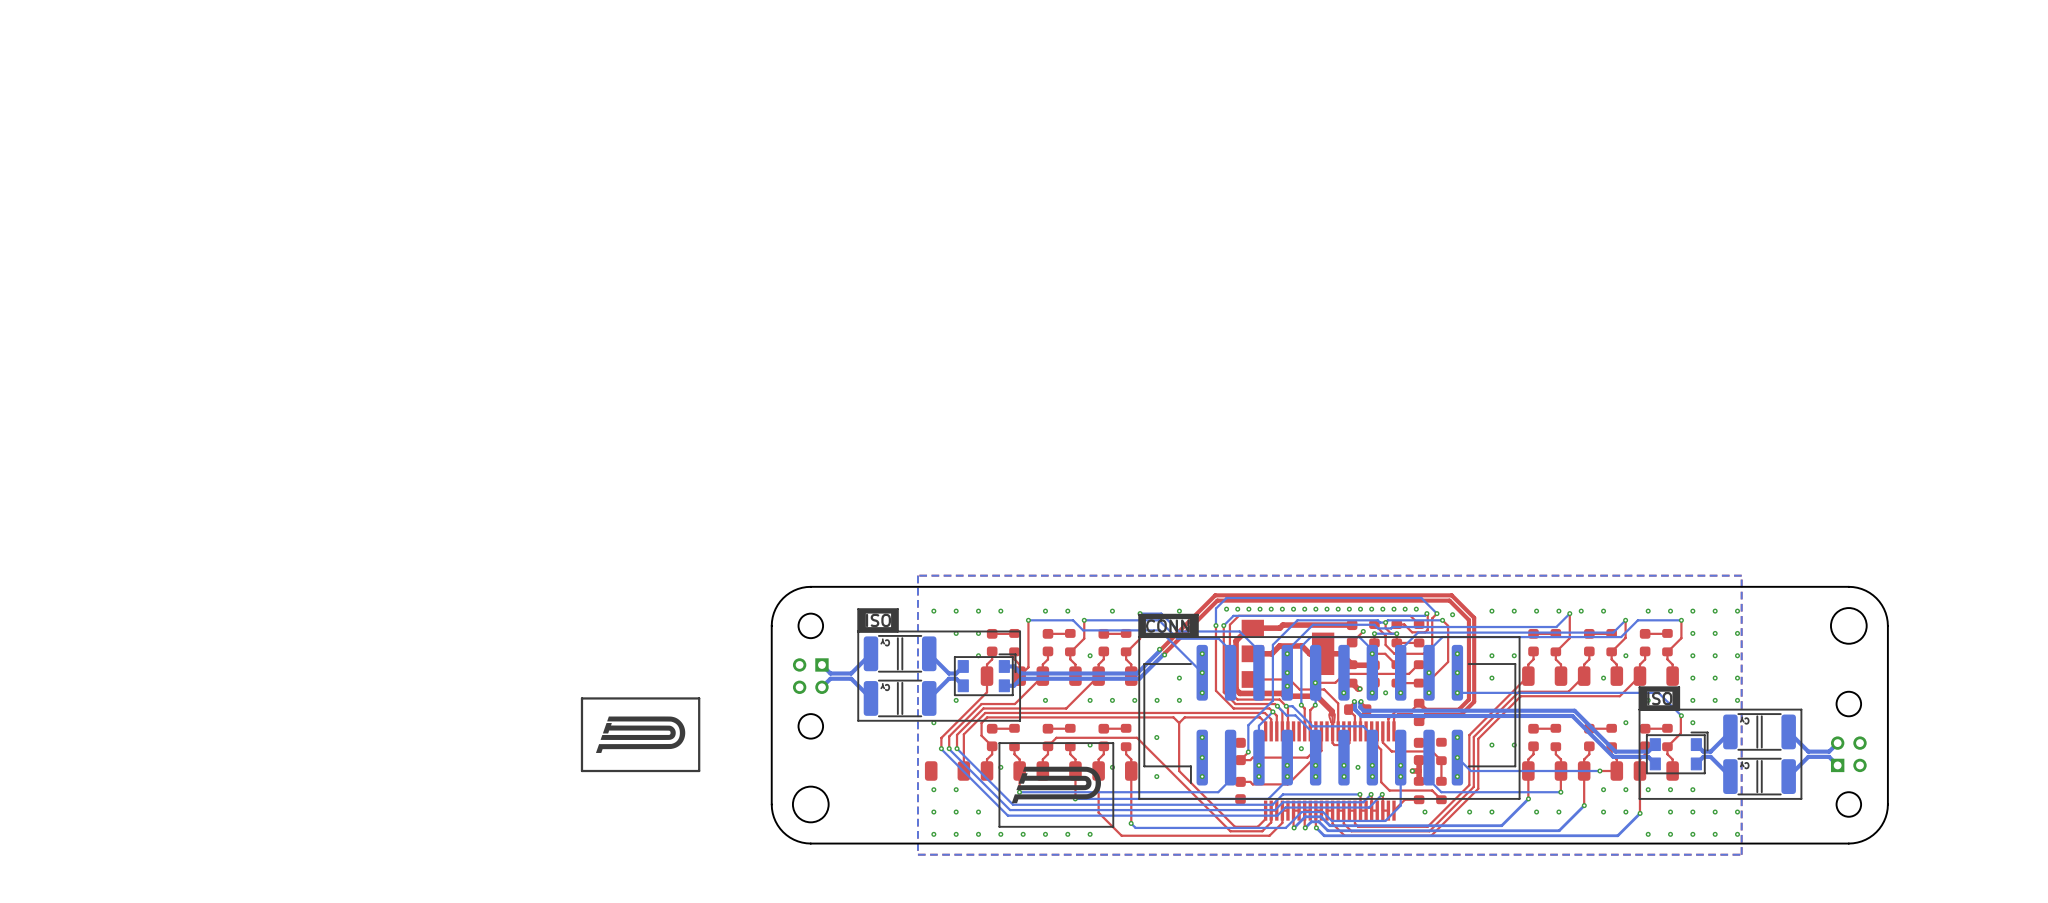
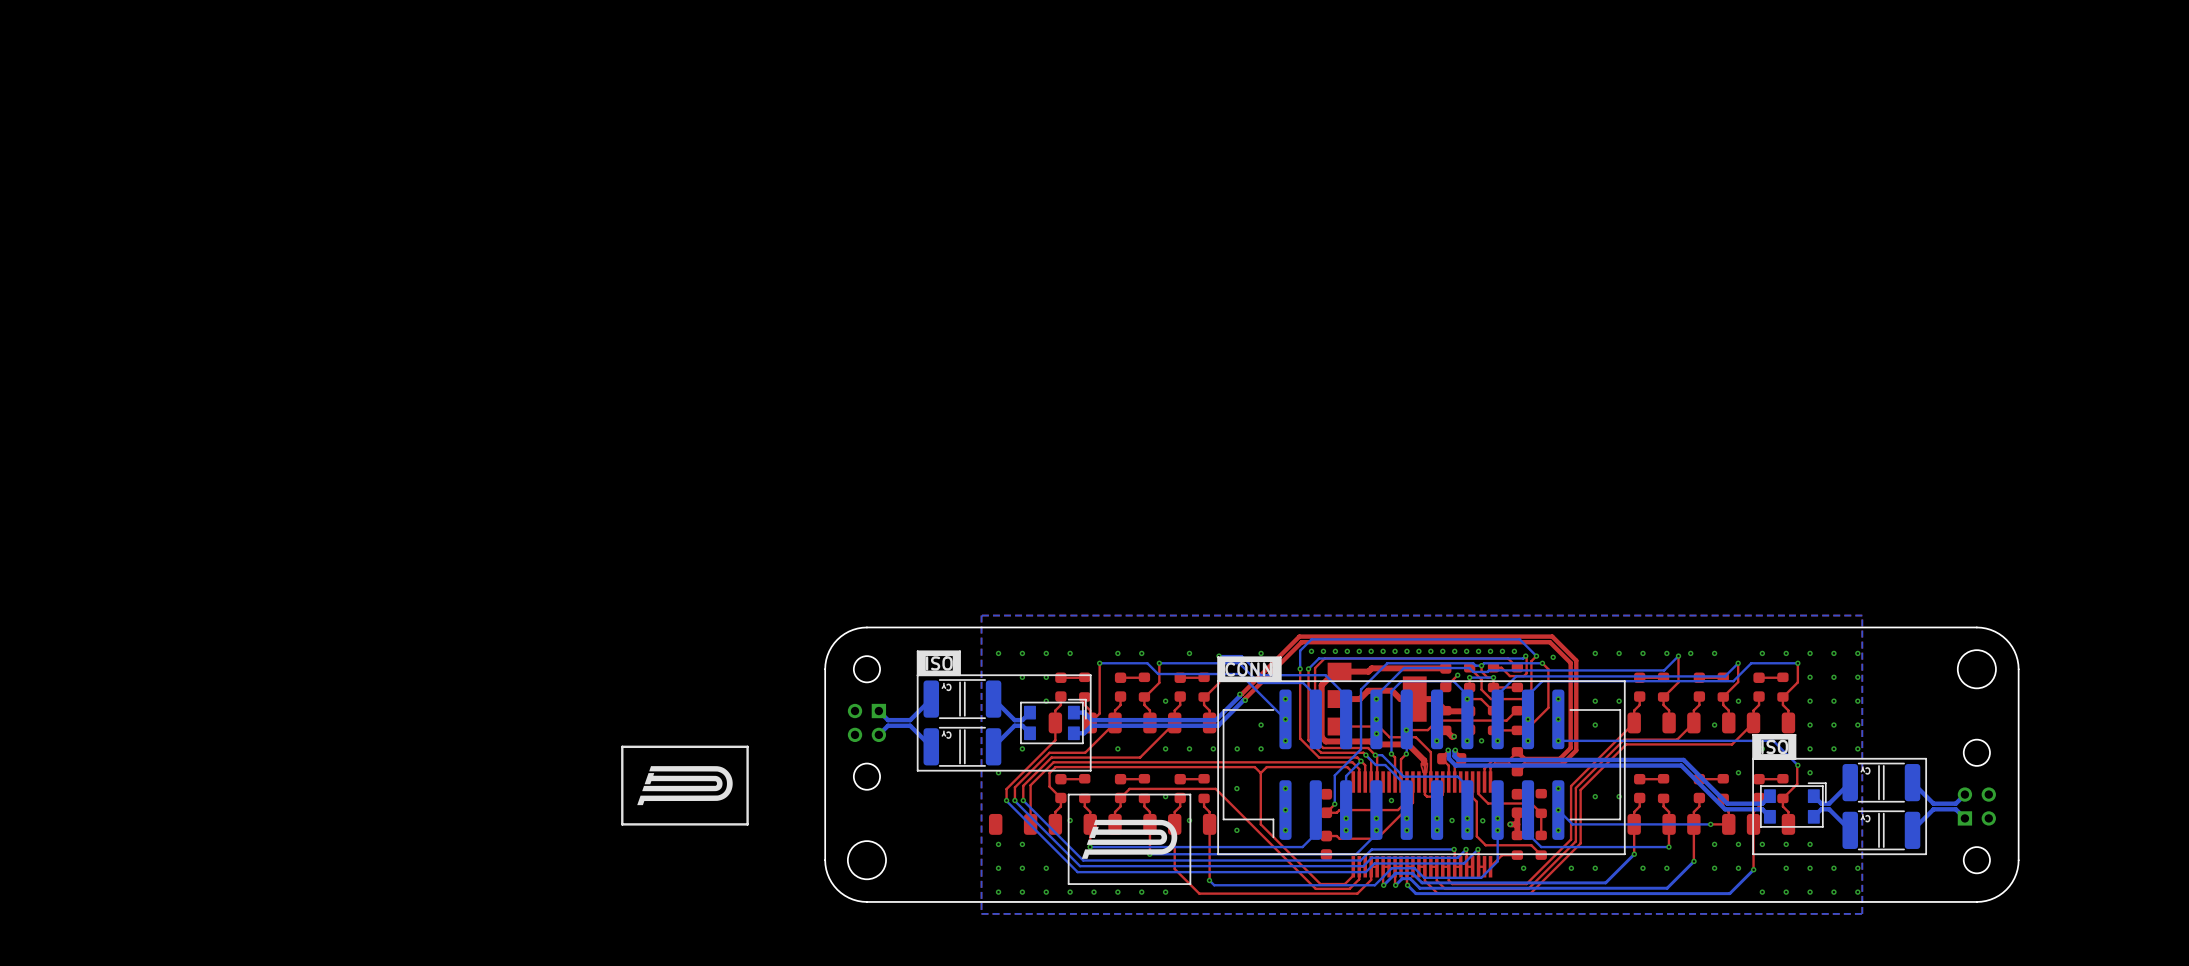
via: none -> (1482, 820)

